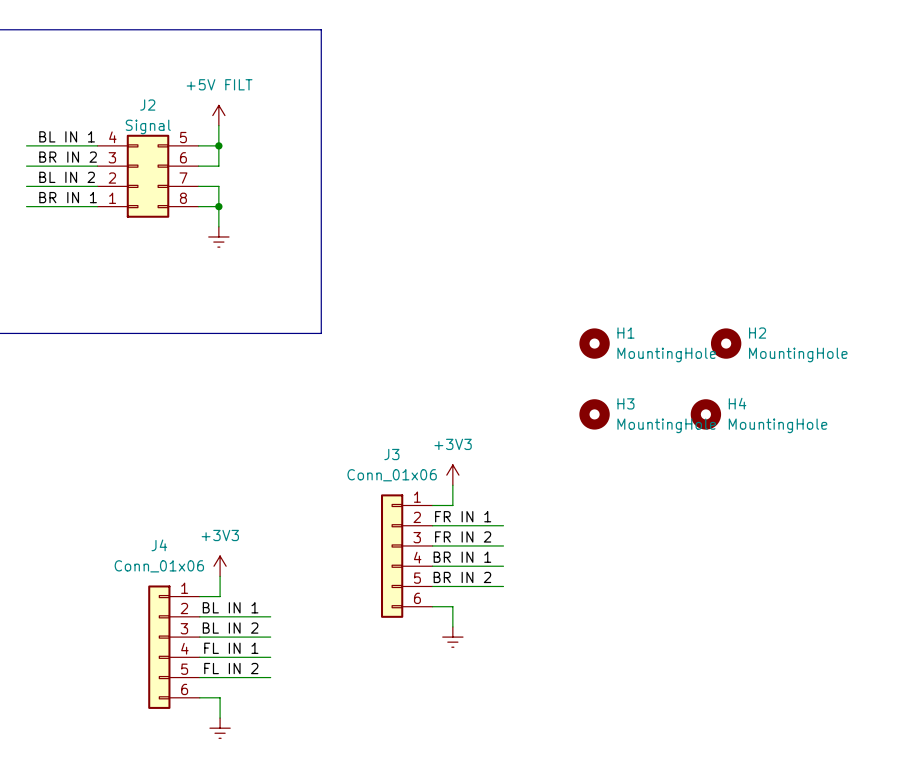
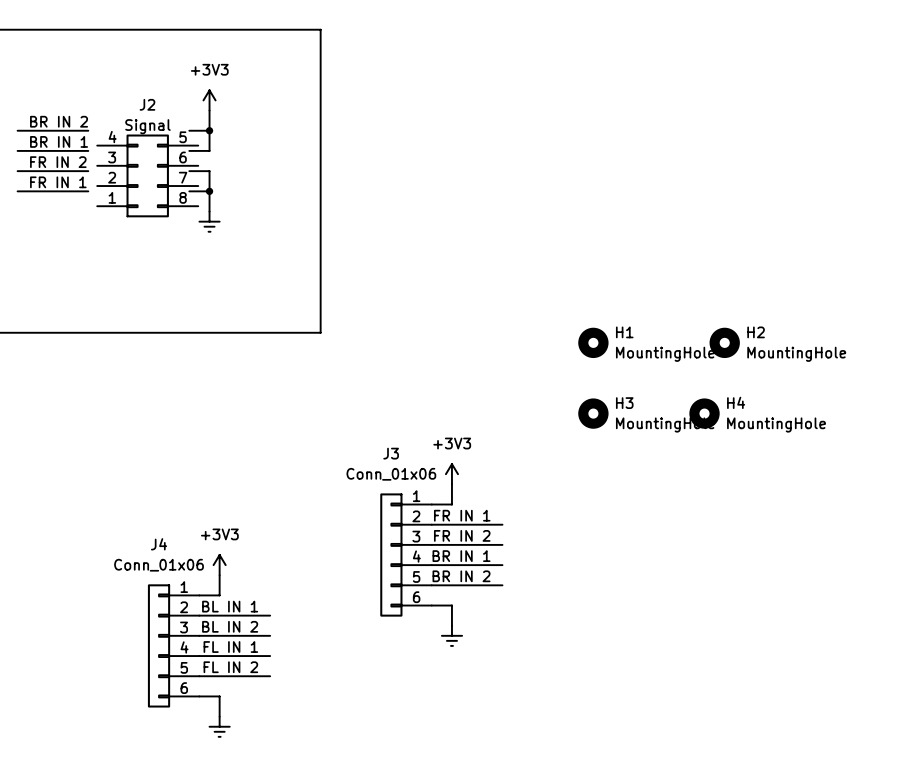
power symbol: none -> +3V3 (209, 100)
power symbol: +5V FILT (218, 115) -> none
wire: (218, 125) (218, 166) (198, 166) -> (209, 110) (209, 150) (189, 150)
label: BL IN 1 (67, 136) -> none
wire: (26, 145) (97, 145) -> (17, 130) (88, 130)
wire: (198, 145) (218, 145) -> (189, 130) (209, 130)
junction position: (218, 145) -> (209, 130)
label position: BR IN 2 (68, 157) -> BR IN 2 (59, 121)
wire: (26, 166) (97, 166) -> (17, 150) (88, 150)
label: BL IN 2 (67, 177) -> FR IN 2 (58, 162)
label: none -> FR IN 1 (58, 182)
wire: (26, 186) (97, 186) -> (17, 171) (88, 171)
wire: (198, 186) (218, 186) (218, 226) -> (189, 171) (209, 171) (209, 211)
label position: BR IN 1 (68, 197) -> BR IN 1 (59, 141)
wire: (26, 206) (97, 206) -> (17, 191) (88, 191)
wire: (198, 206) (218, 206) -> (189, 191) (209, 191)
junction position: (218, 206) -> (209, 191)
power symbol position: (218, 236) -> (209, 221)

